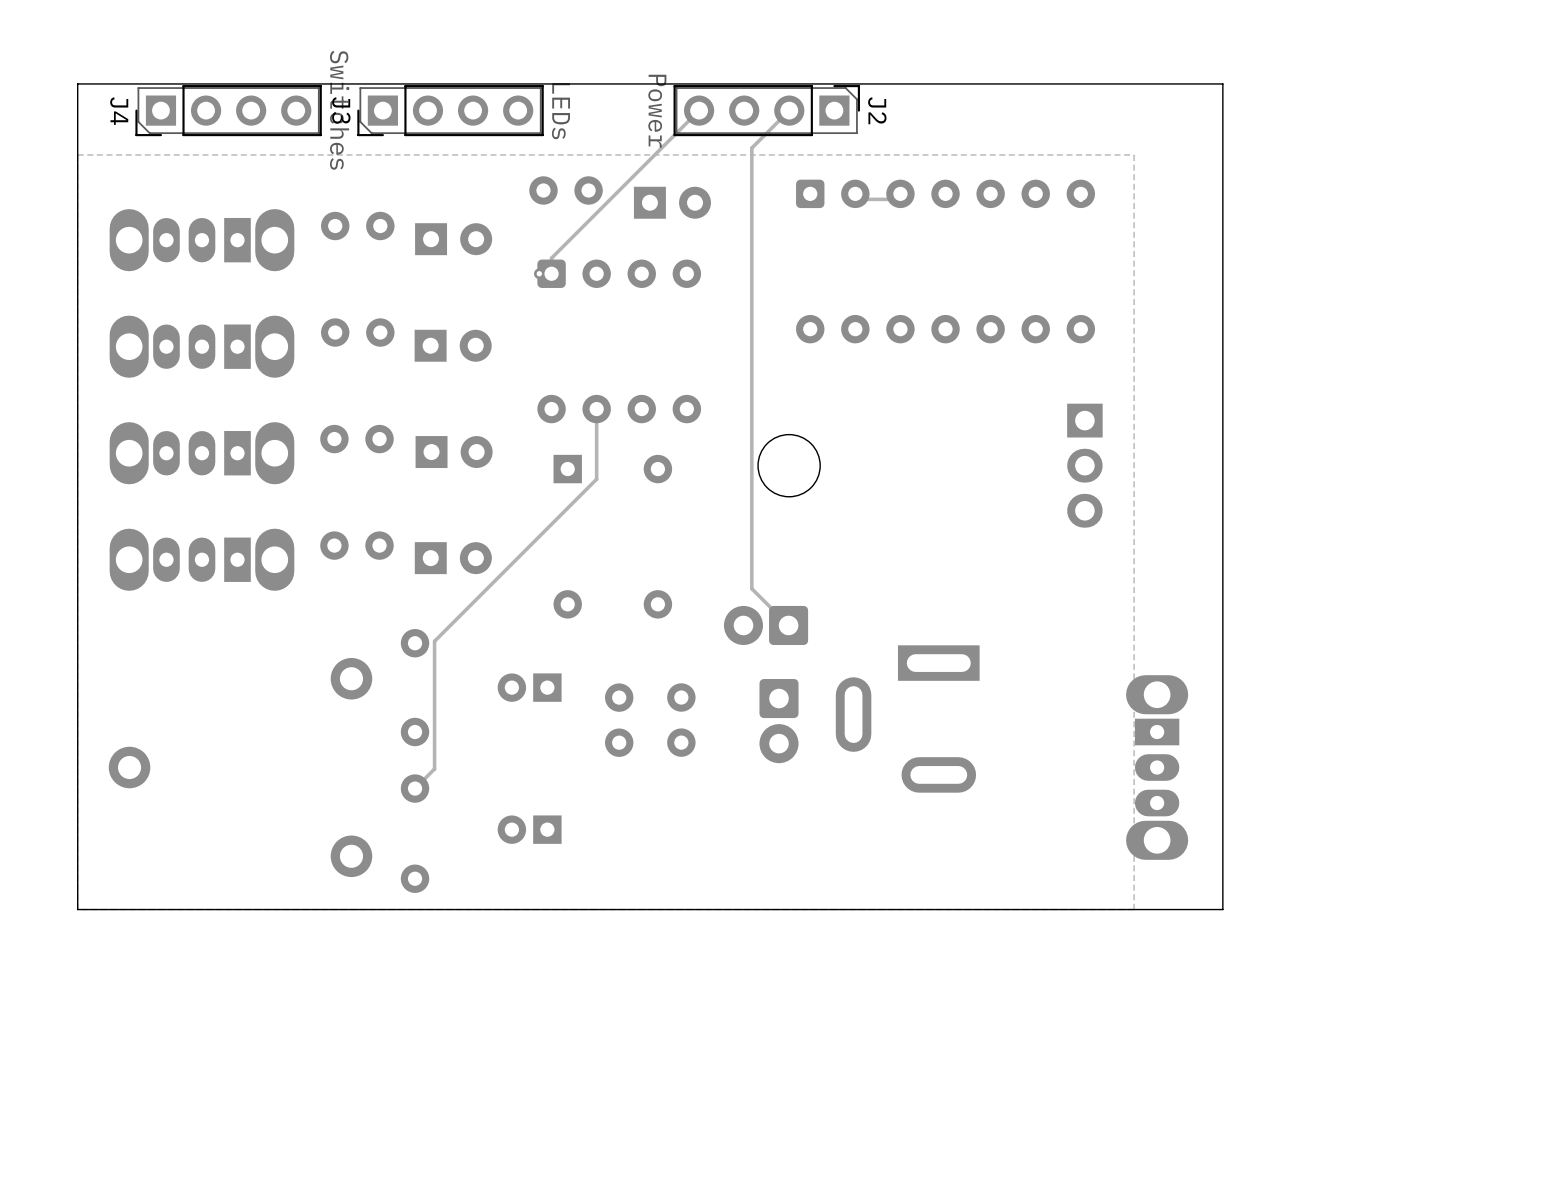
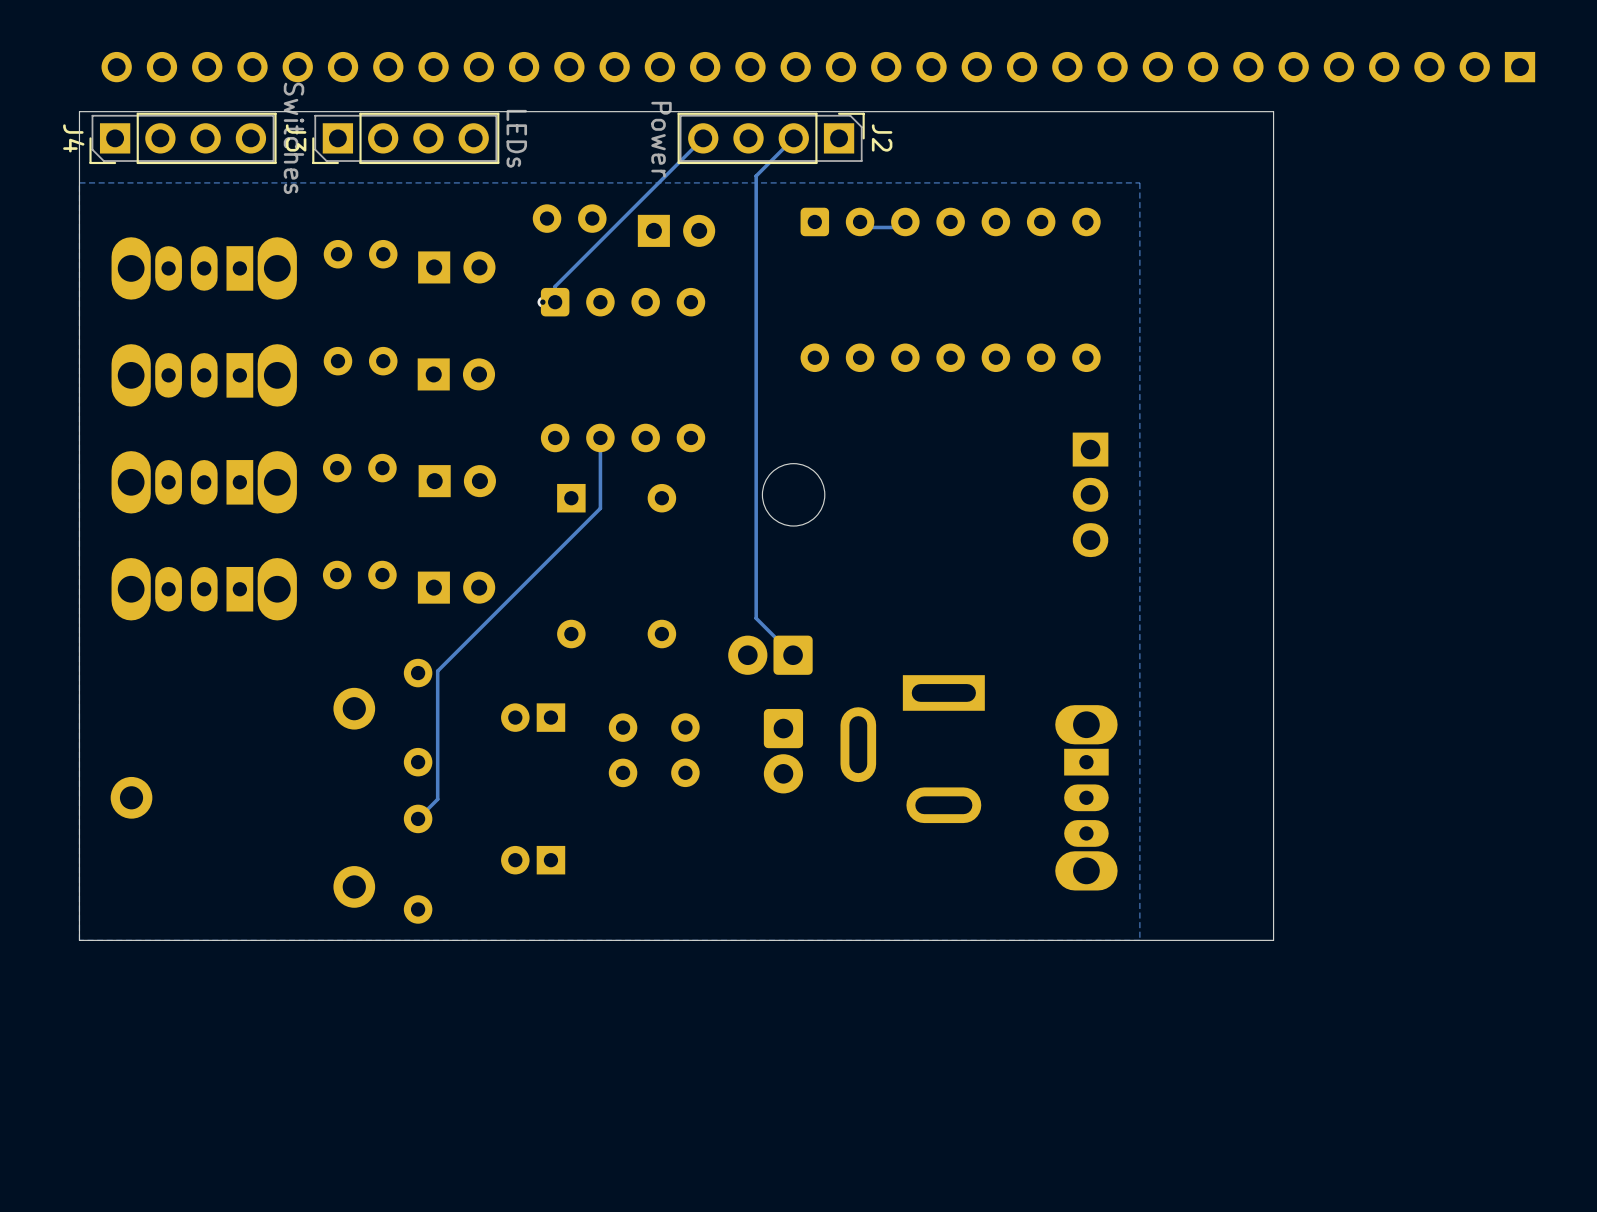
part: none -> (818, 67)
board edge: (1222, 83) (1222, 909) -> (1229, 111) (1273, 111) (1273, 940) (1229, 940)
J4 position: (228, 110) -> (183, 138)
J3 position: (450, 110) -> (405, 138)
part position: (1157, 767) -> (1086, 797)

